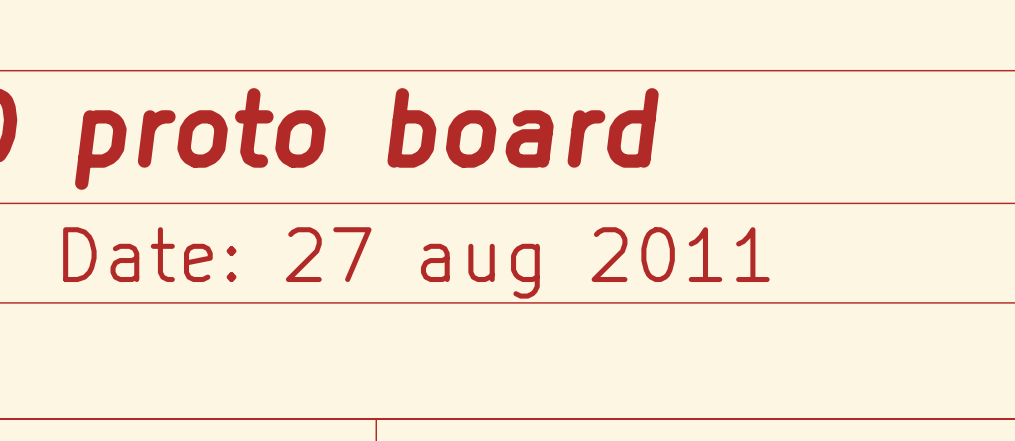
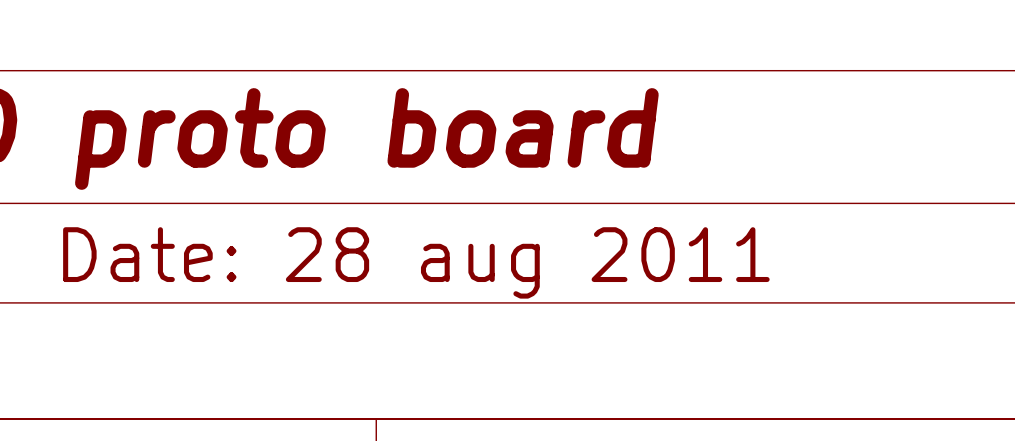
title block: Date: 27 aug 2011 (416, 262) -> Date: 28 aug 2011 (416, 262)

